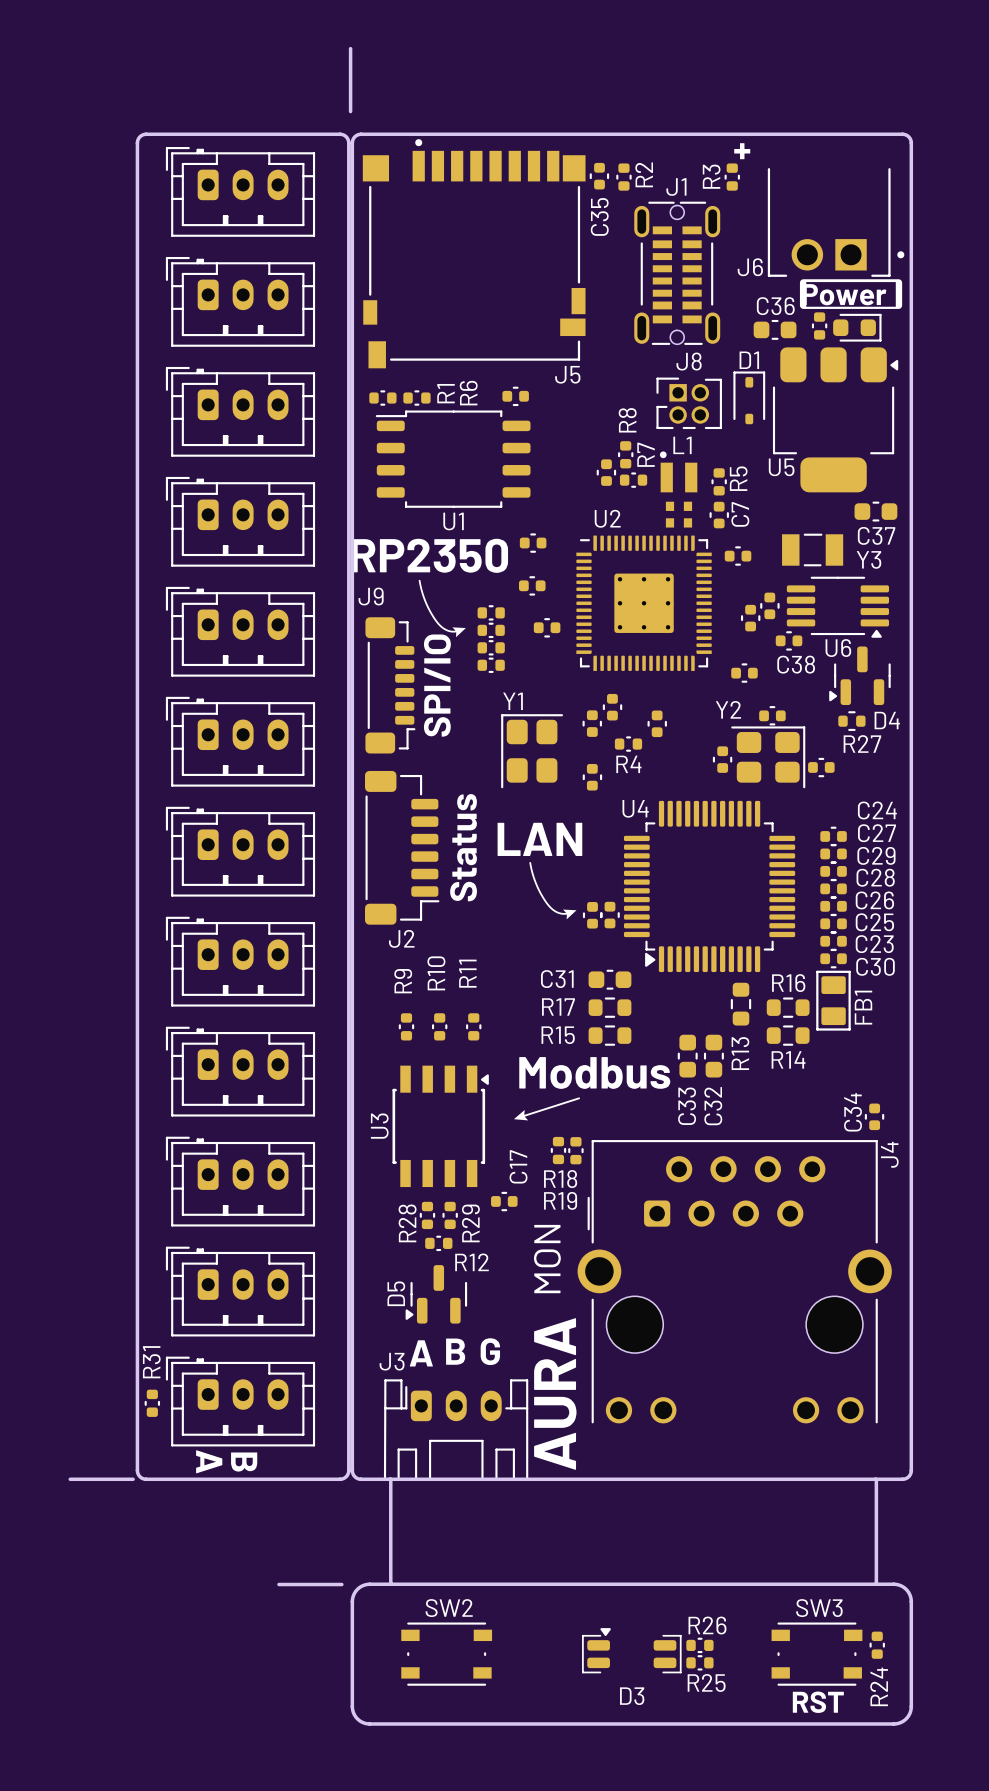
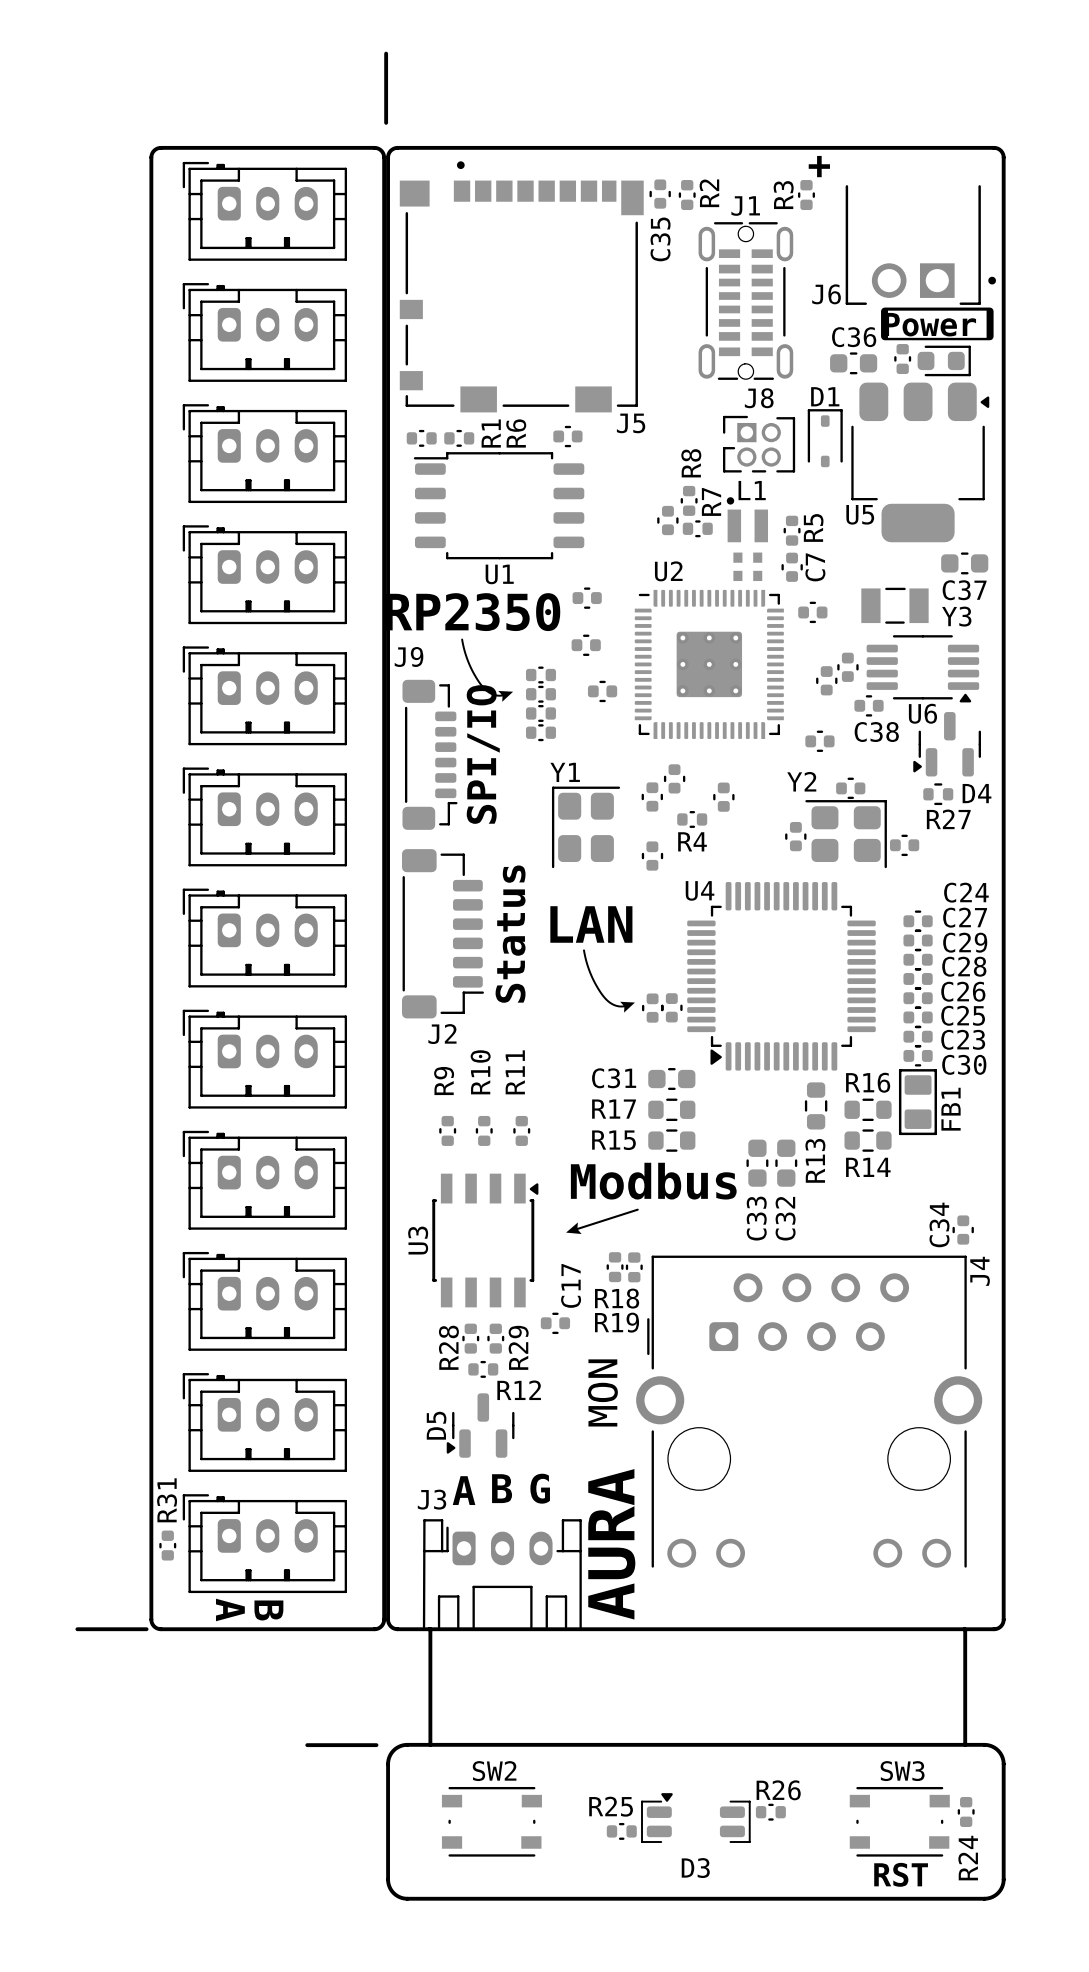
J5 footprint: [362, 139, 586, 369] -> [399, 161, 644, 413]
R25 position: (699, 1662) -> (621, 1831)
R25 name position: R25 (706, 1682) -> R25 (611, 1806)

